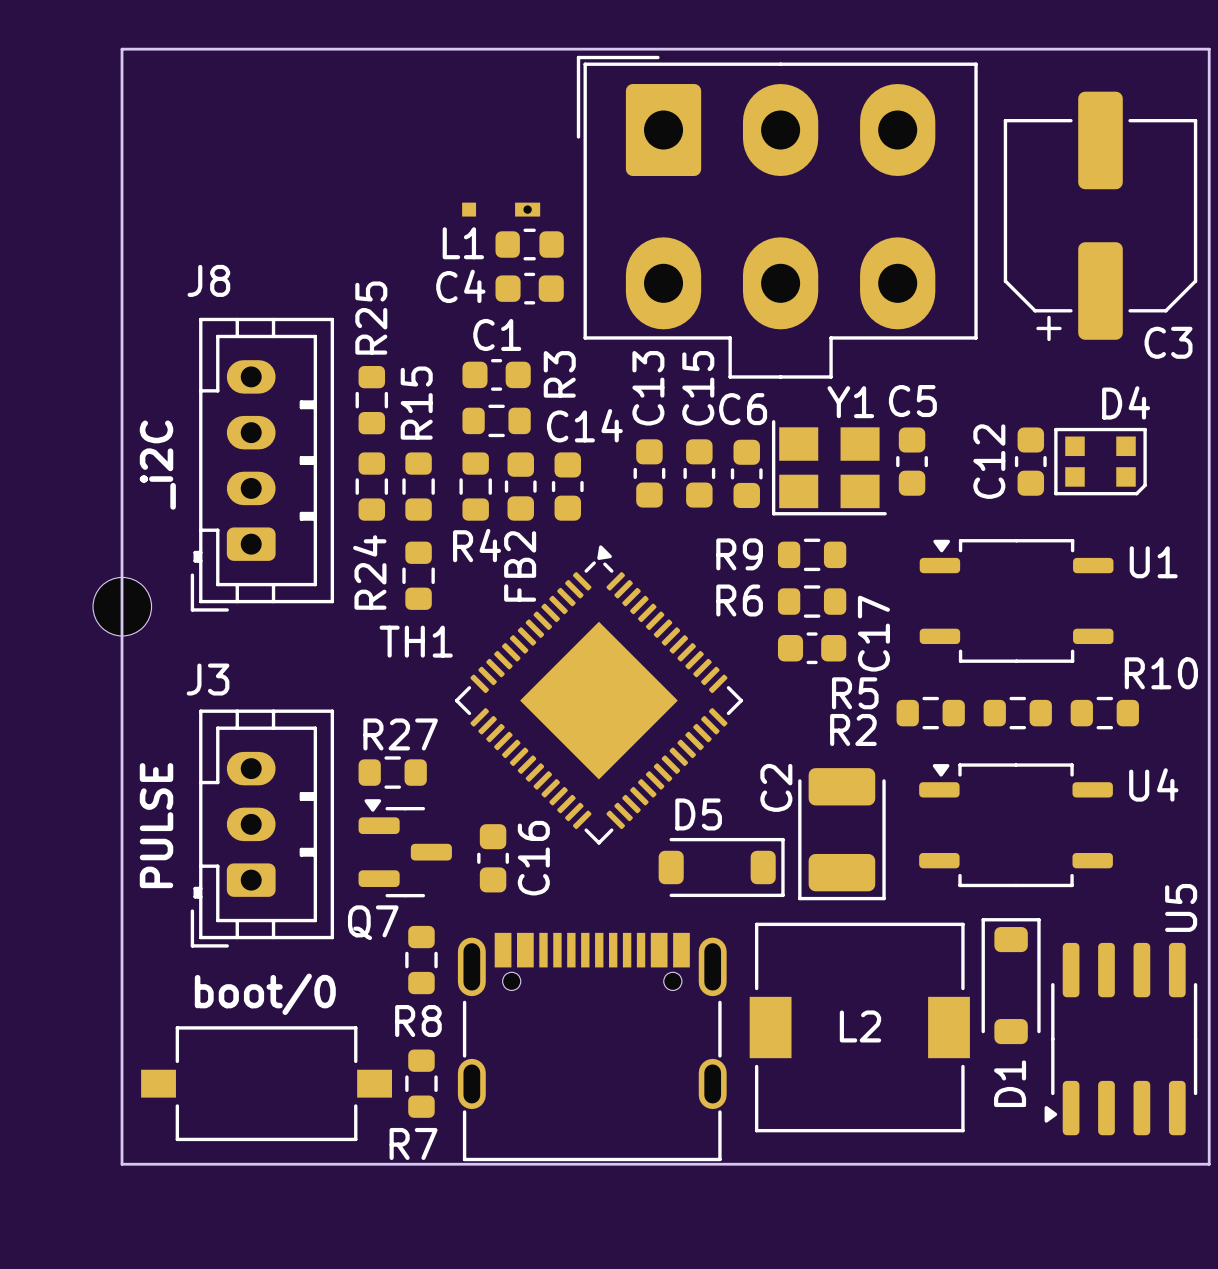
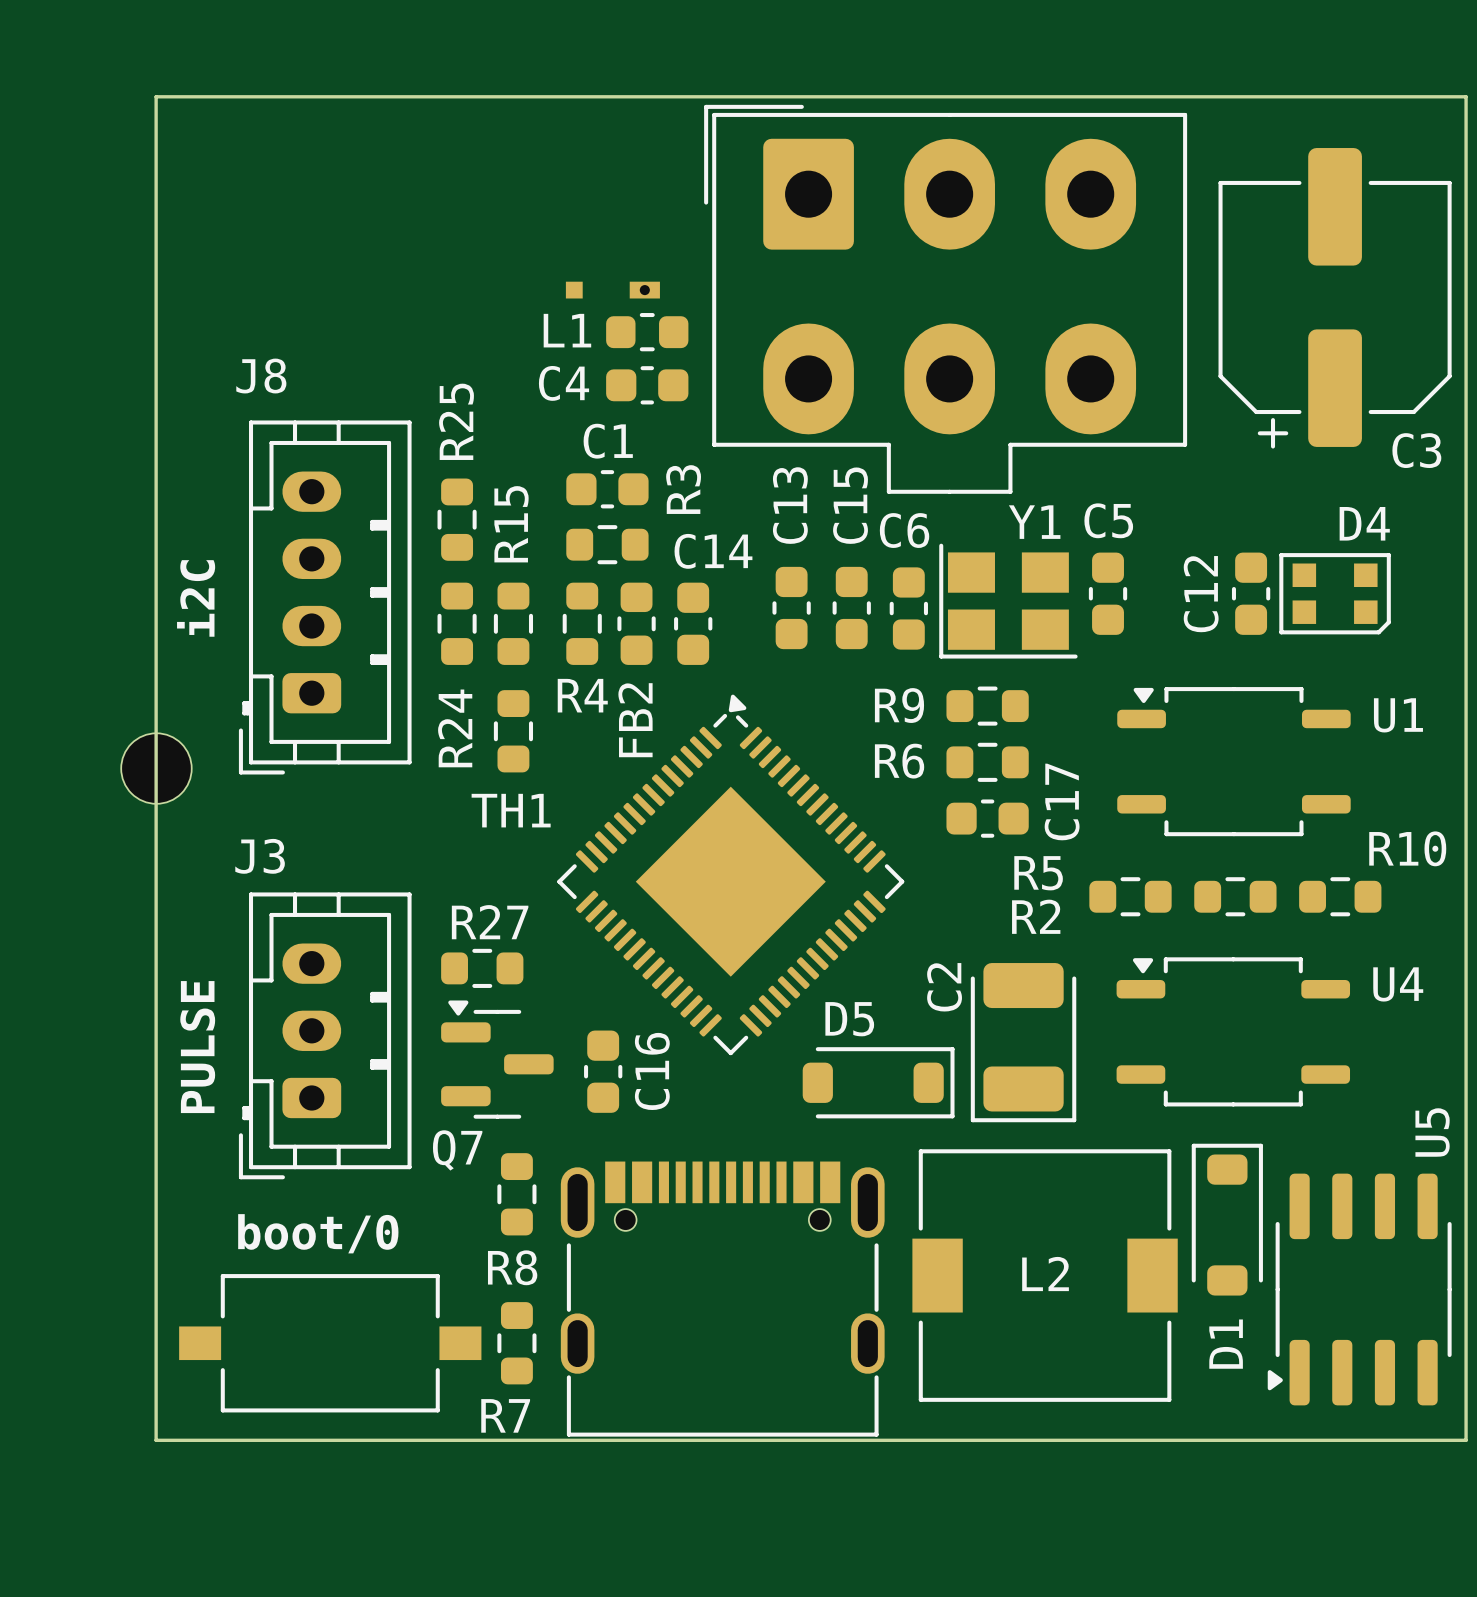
text: _i2C (157, 465) -> i2C (196, 598)

